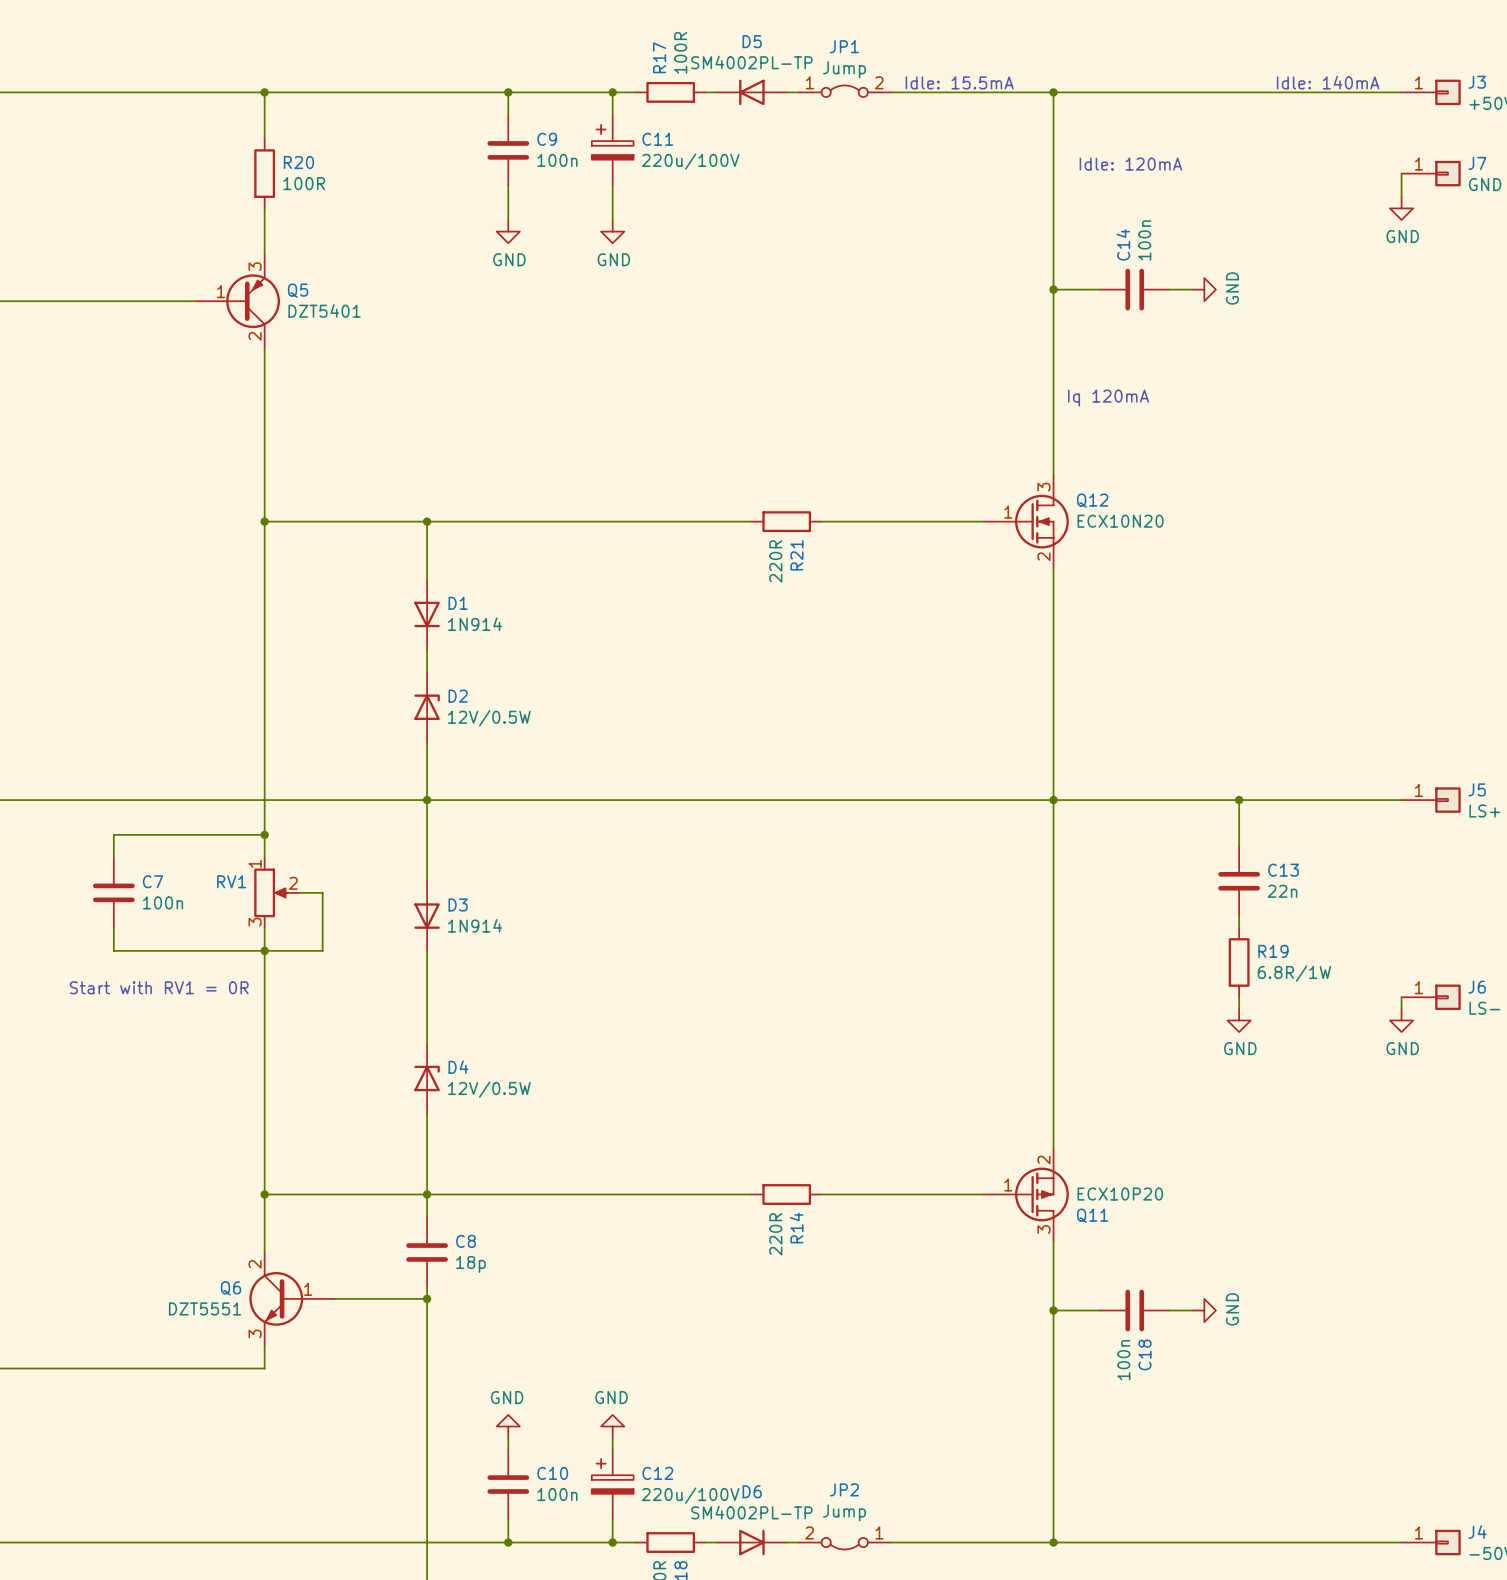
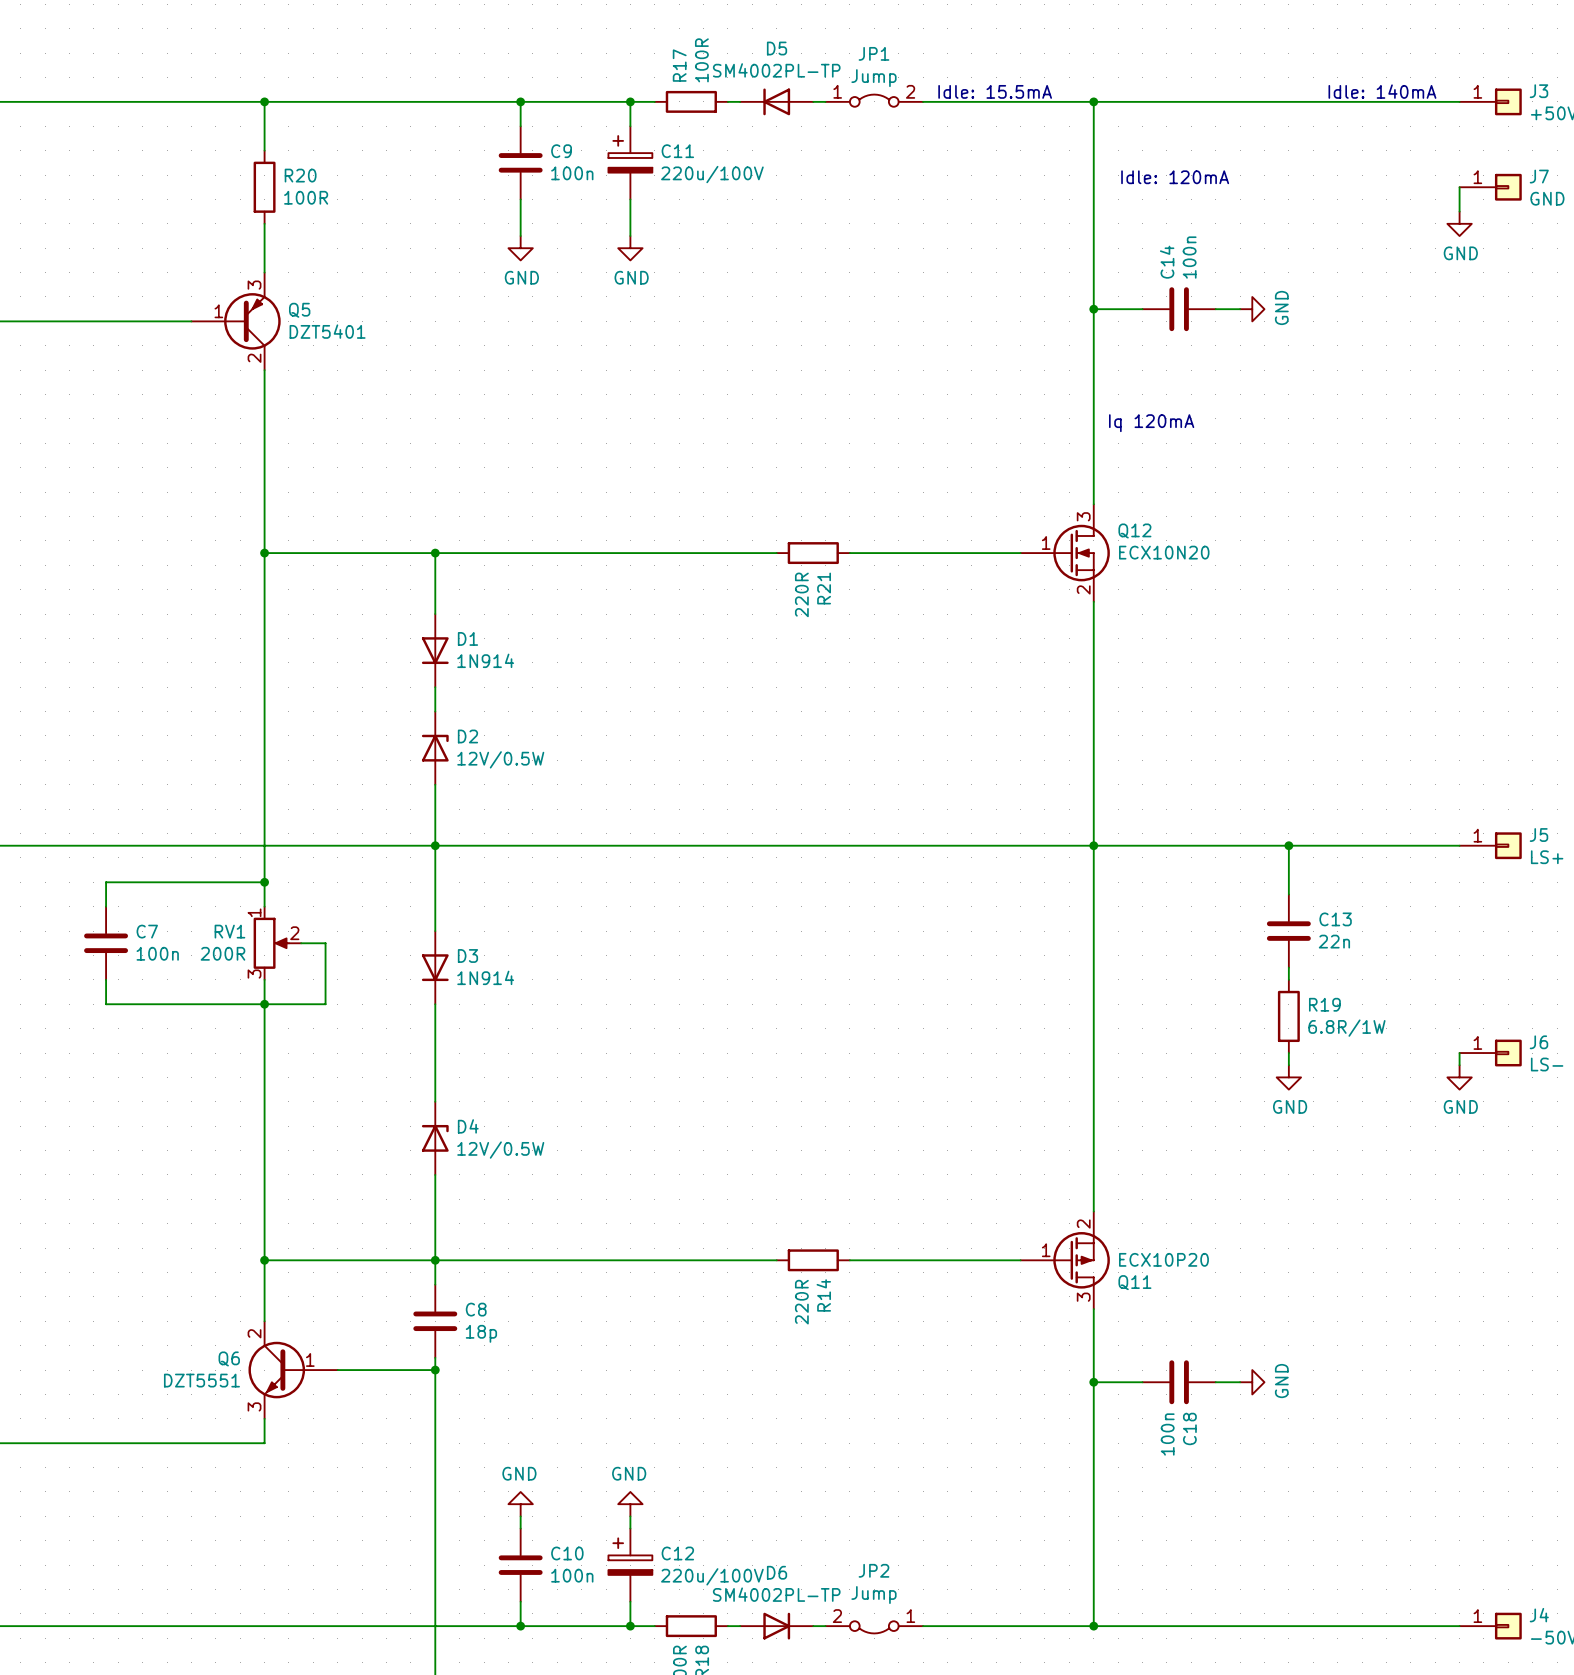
RV1 value: none -> 200R (222, 953)
text: Start with RV1 = 0R (159, 987) -> none

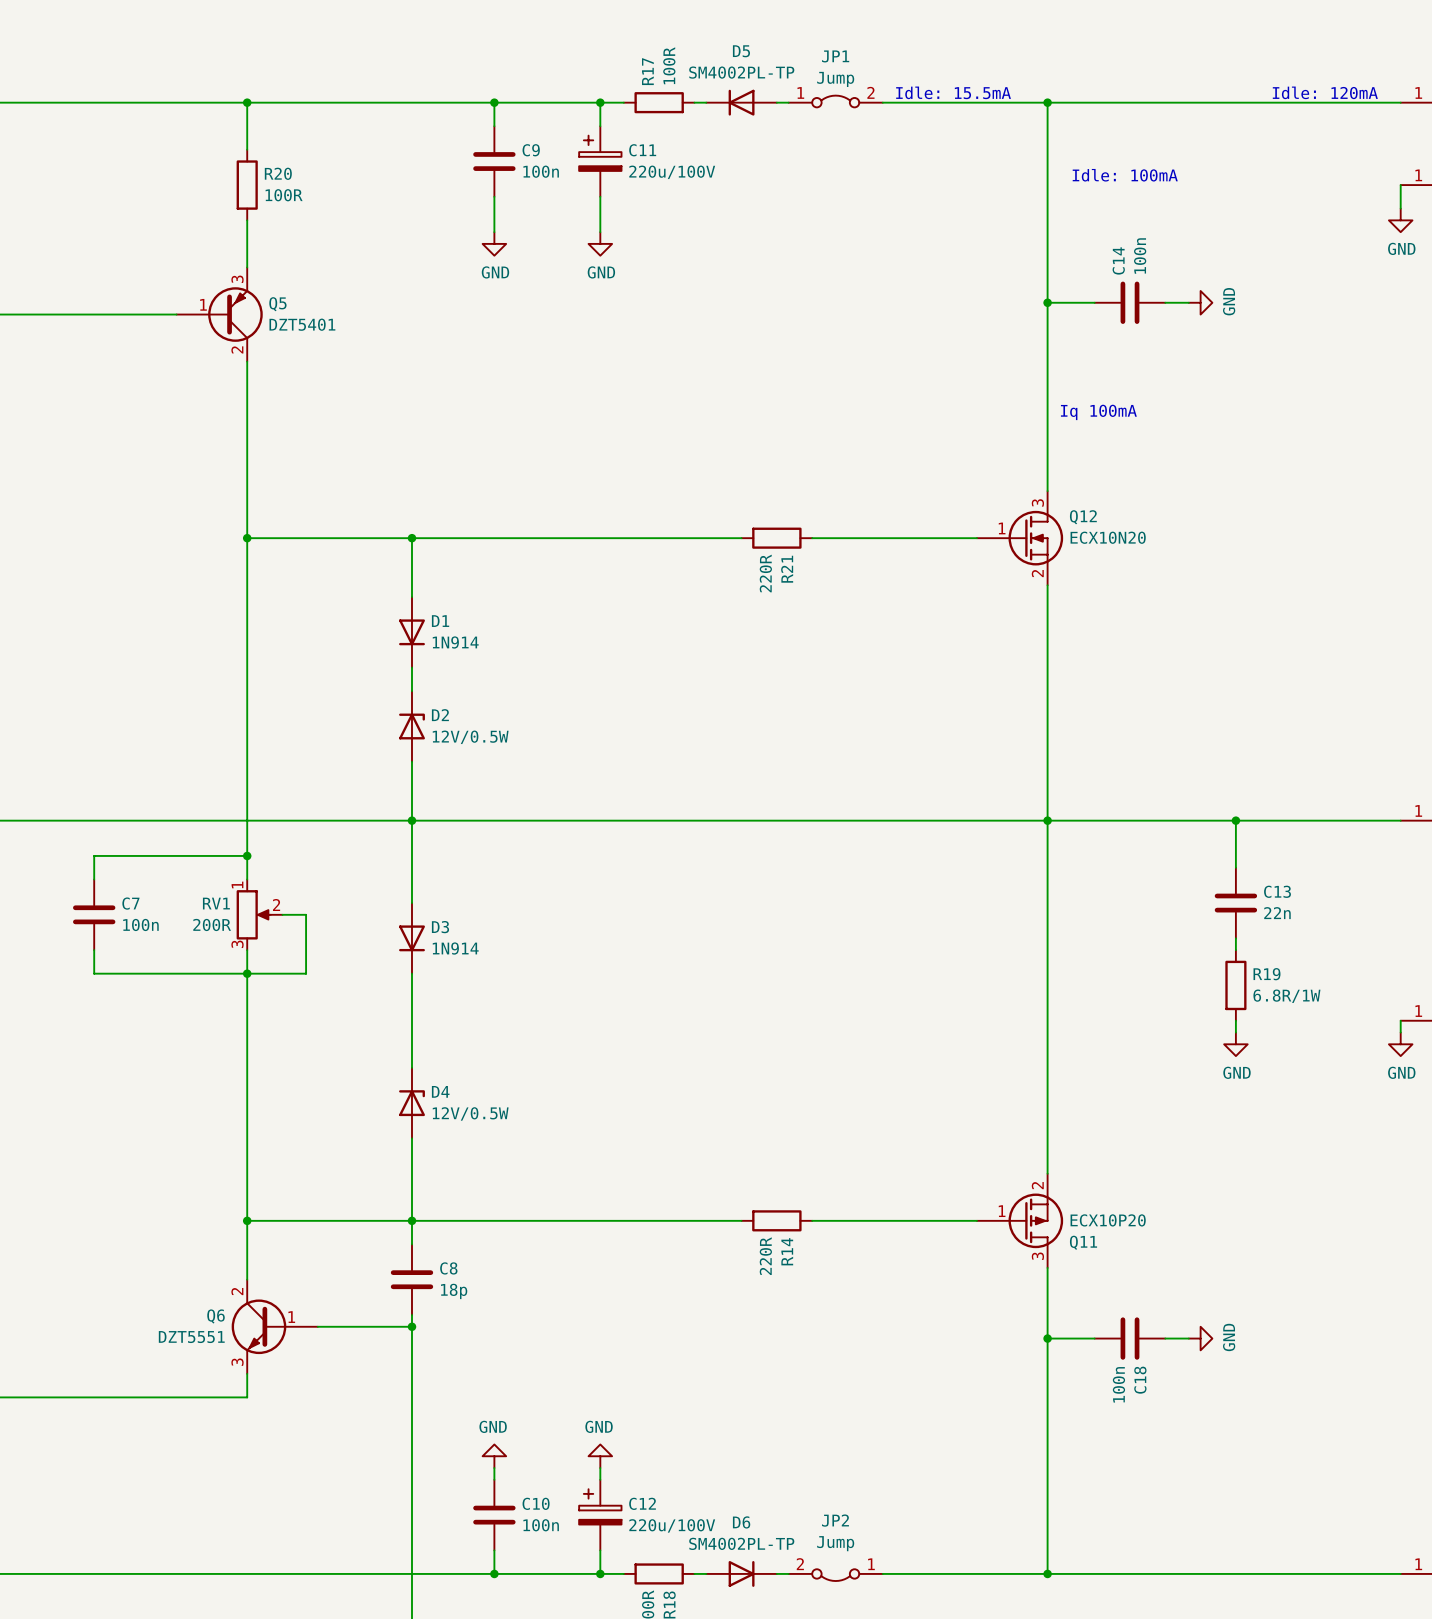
text: Idle: 140mA (1382, 91) -> Idle: 120mA (1325, 92)
text: Idle: 120mA (1175, 177) -> Idle: 100mA (1125, 175)
text: Iq 120mA (1151, 423) -> Iq 100mA (1098, 412)

